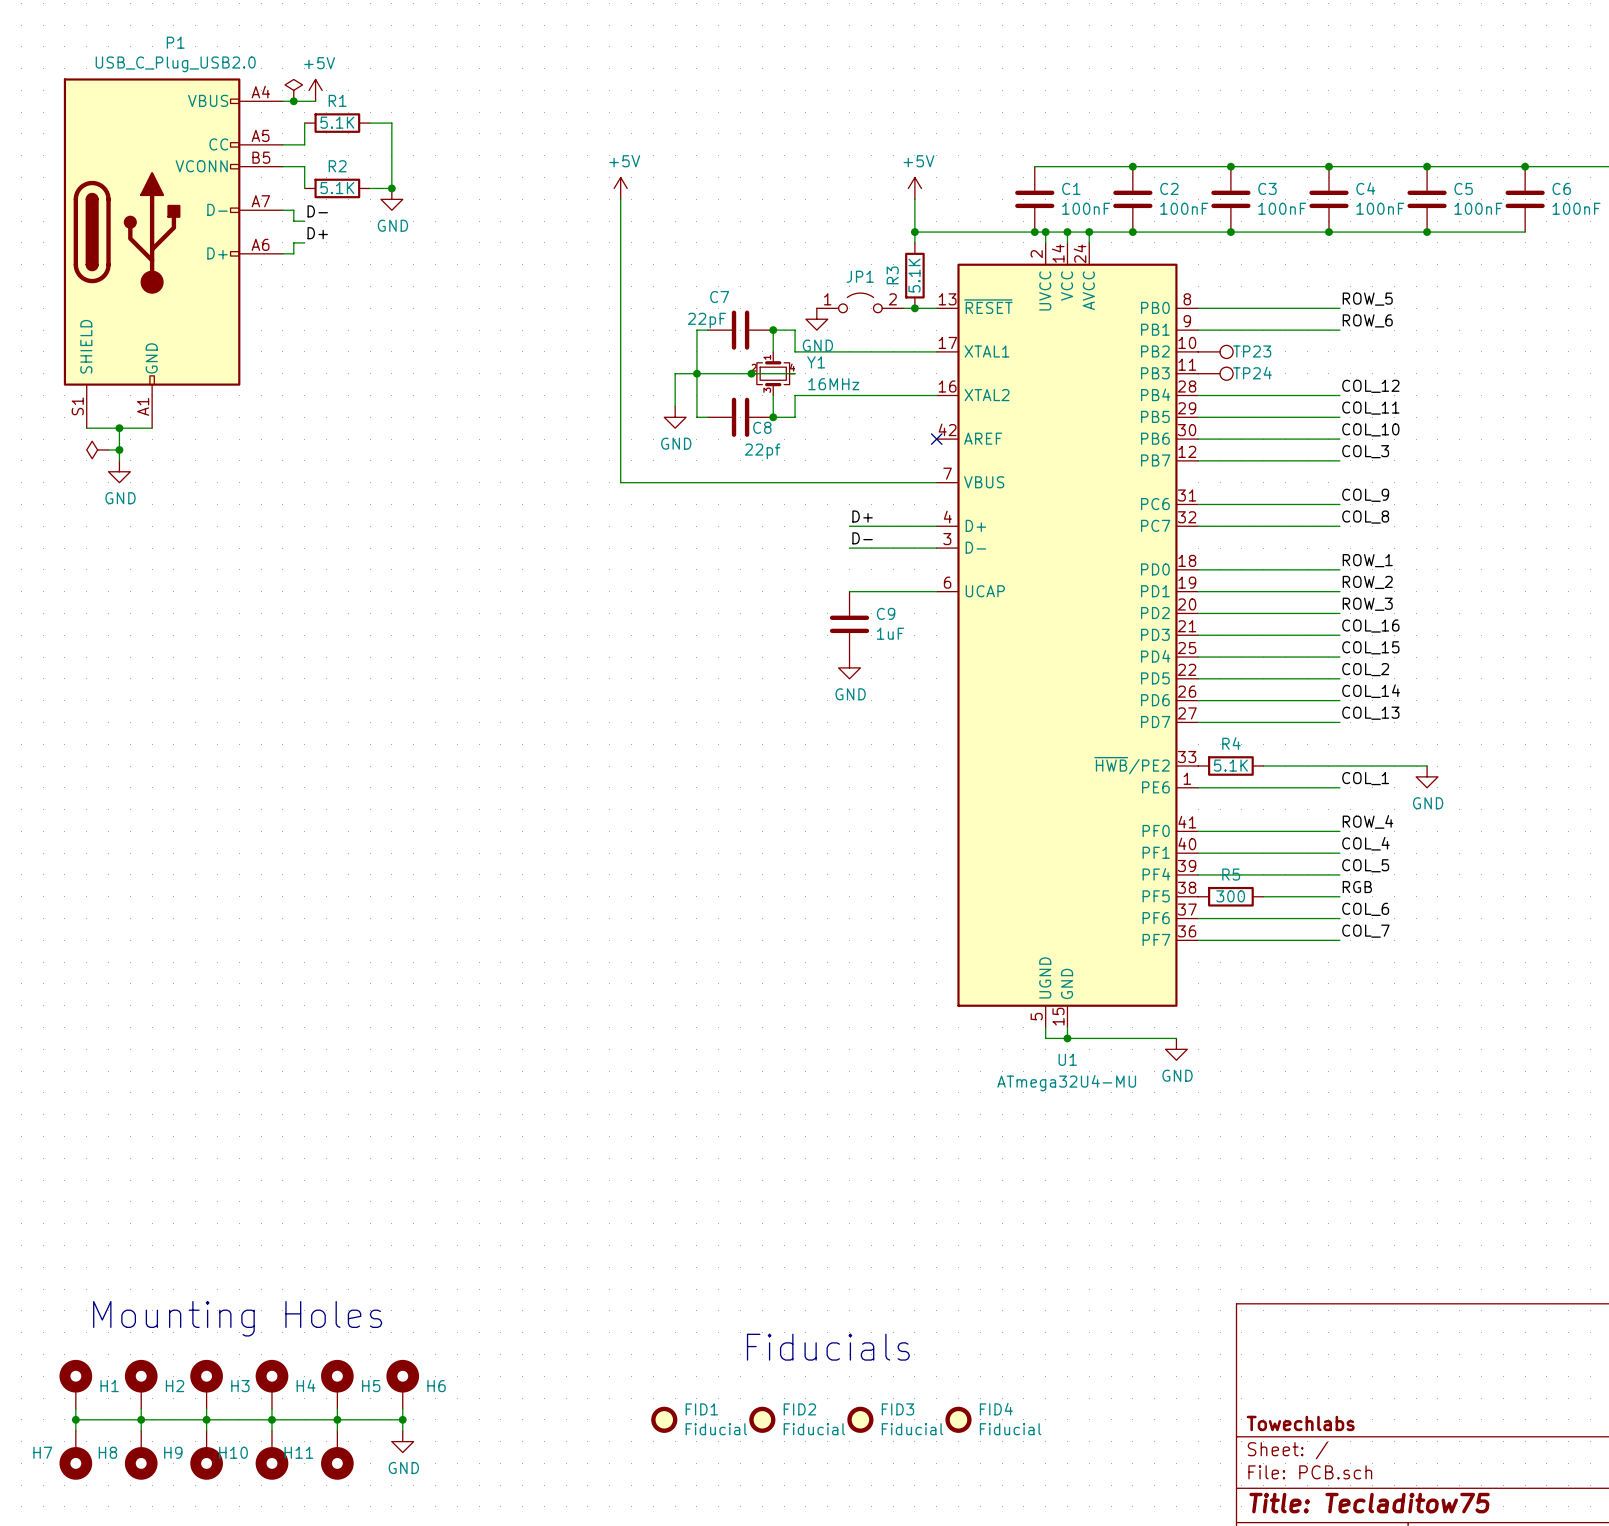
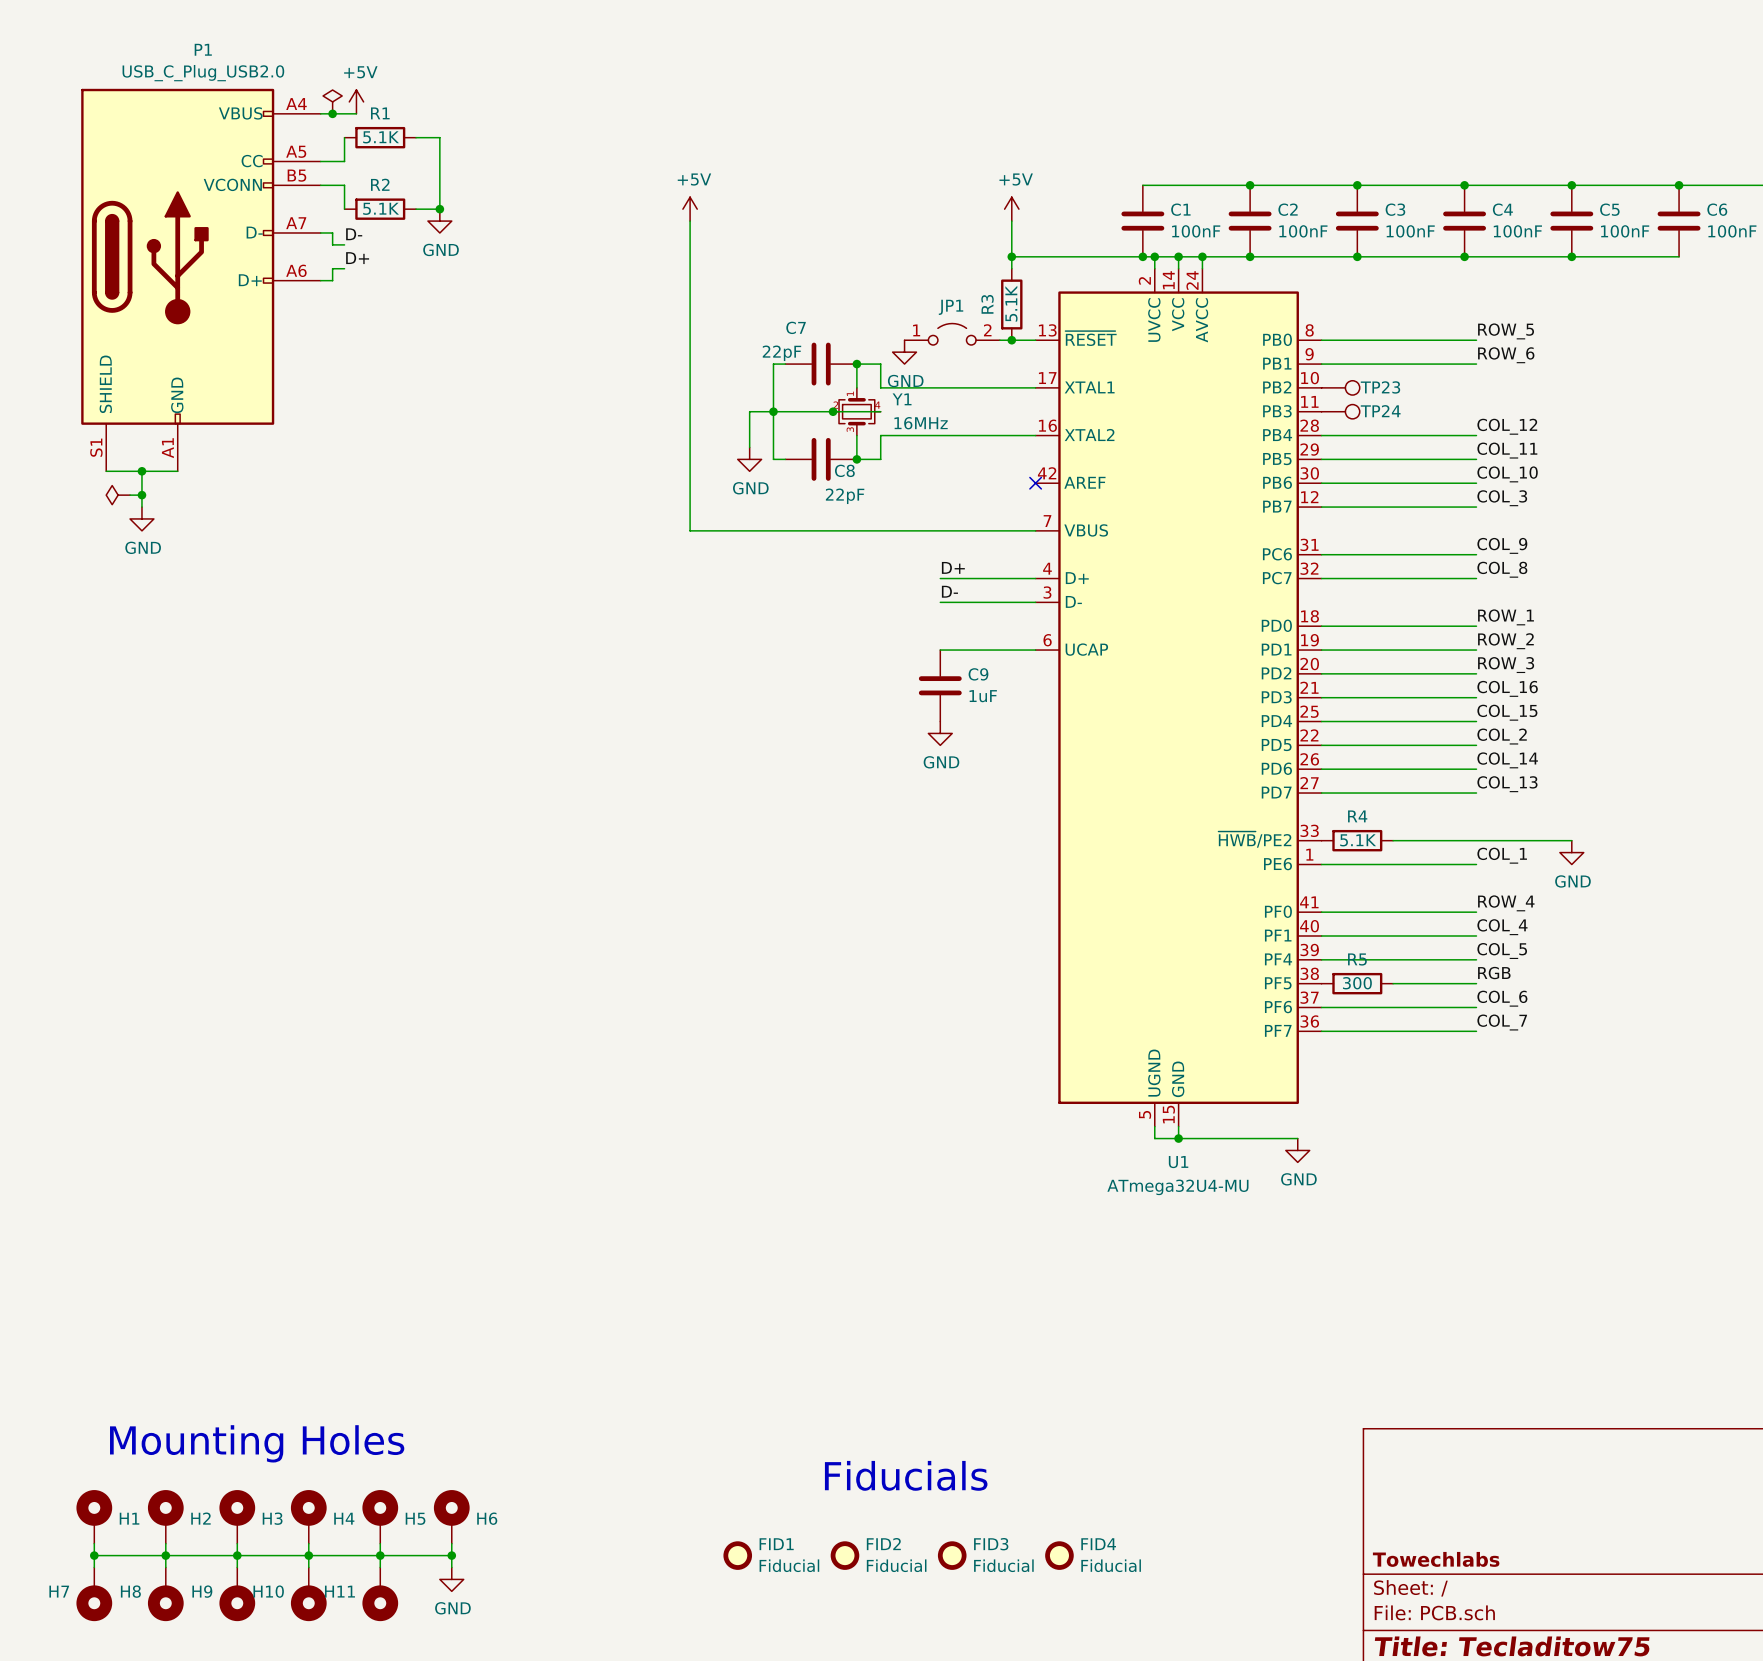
C8 value: 22pf (762, 451) -> 22pF (845, 496)

